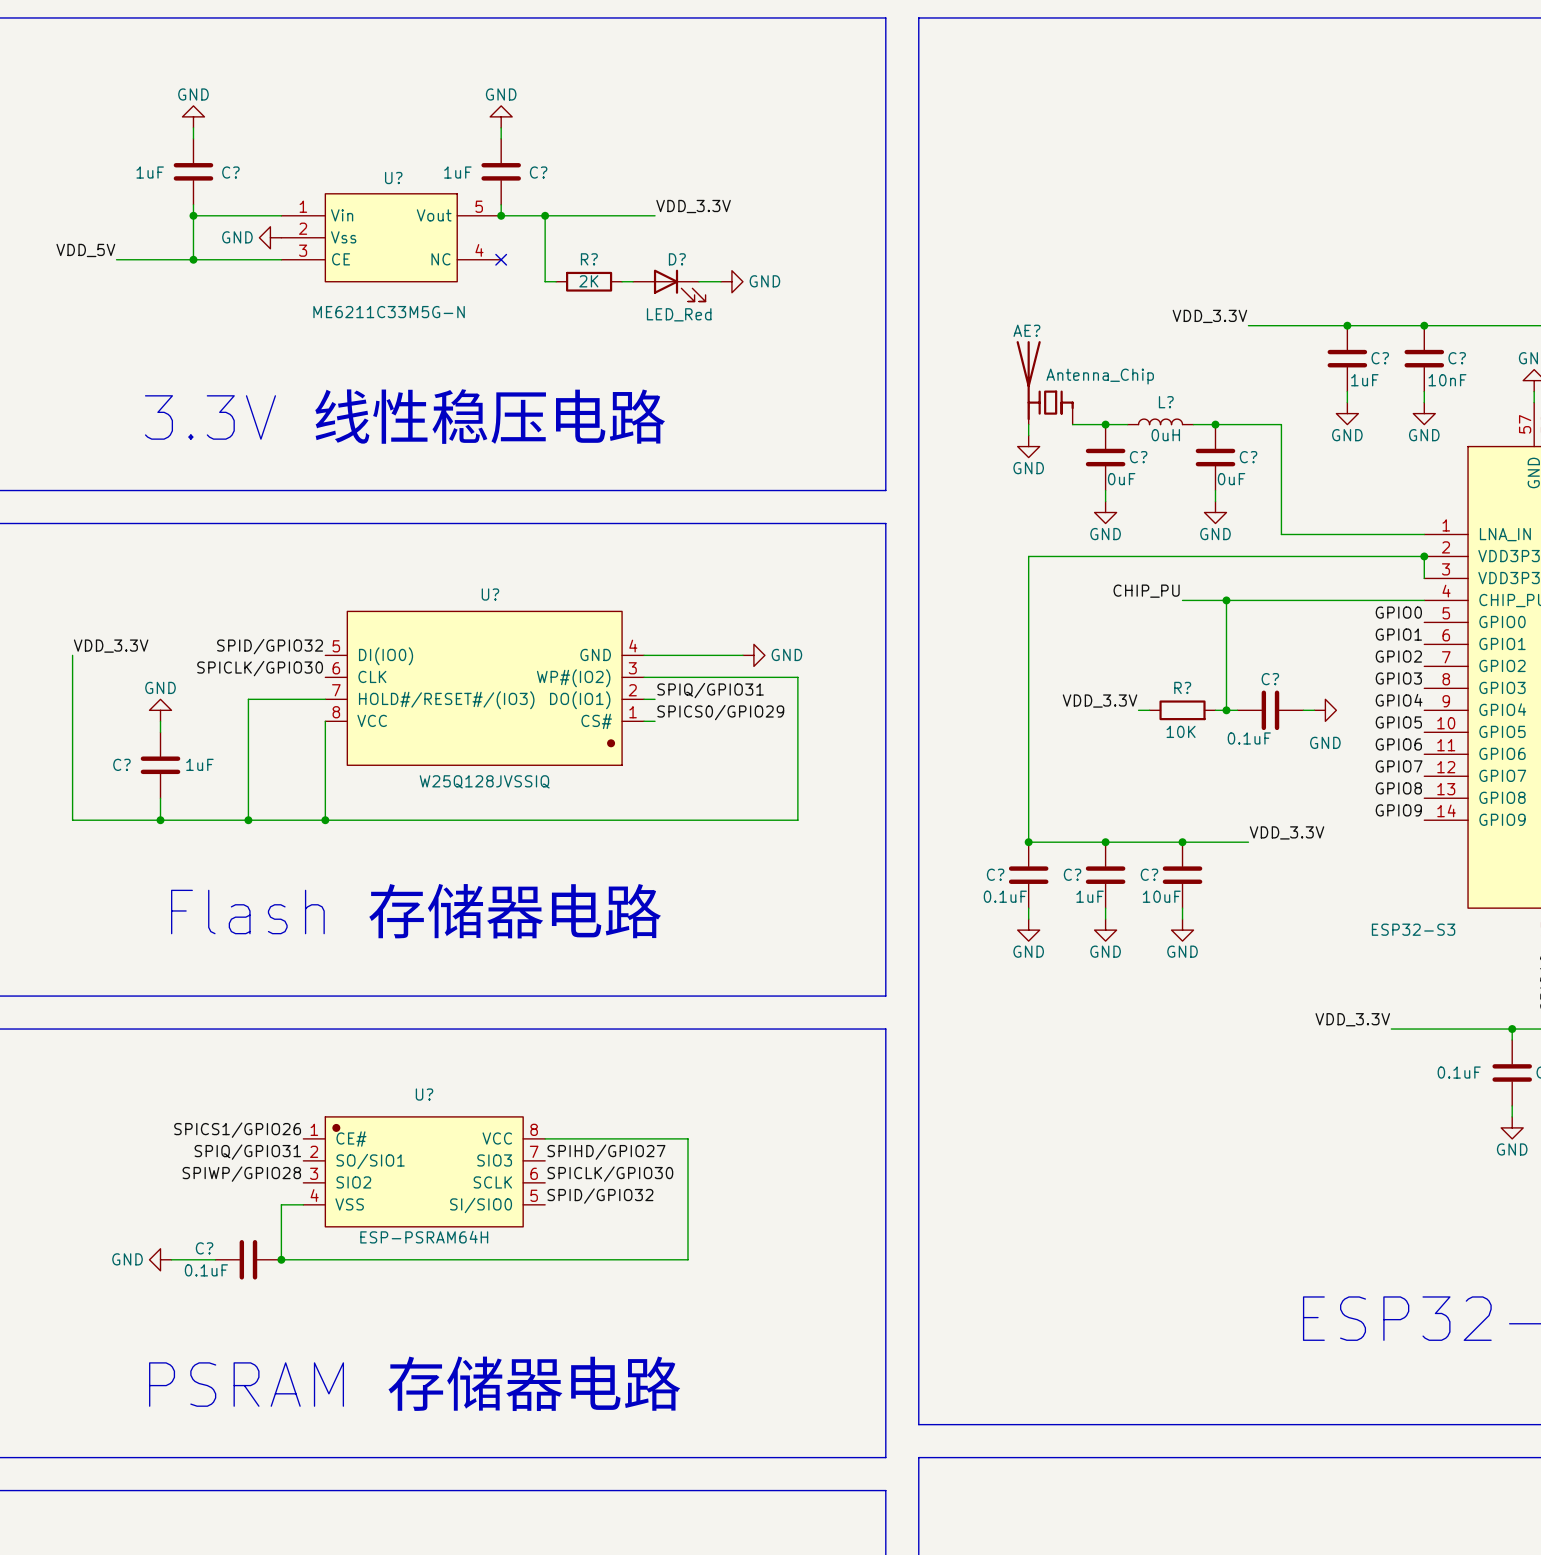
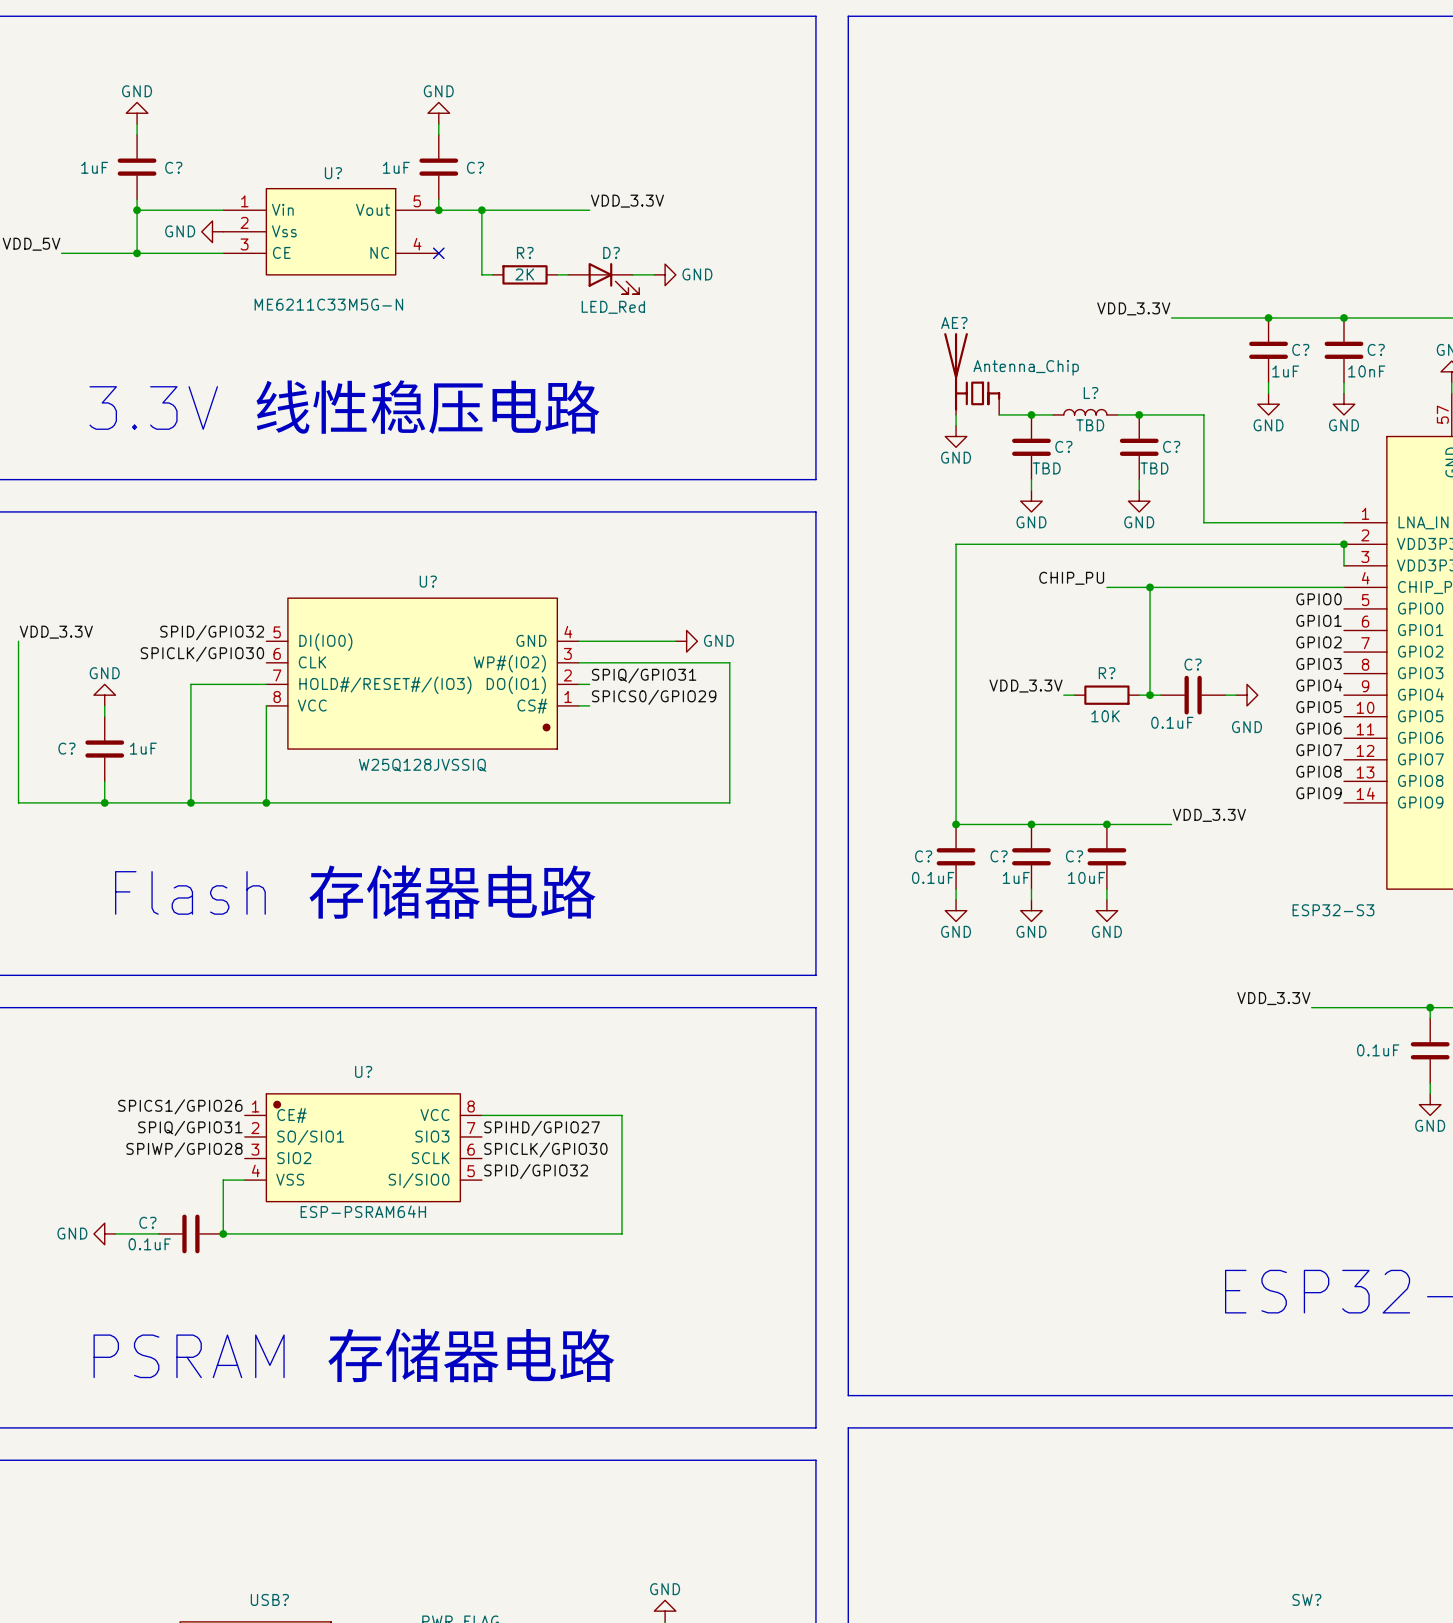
L? value: 0uH (1165, 435) -> TBD (1090, 425)
C? value: 0uF (1121, 479) -> TBD (1046, 468)
C? value: 0uF (1231, 479) -> TBD (1154, 468)

